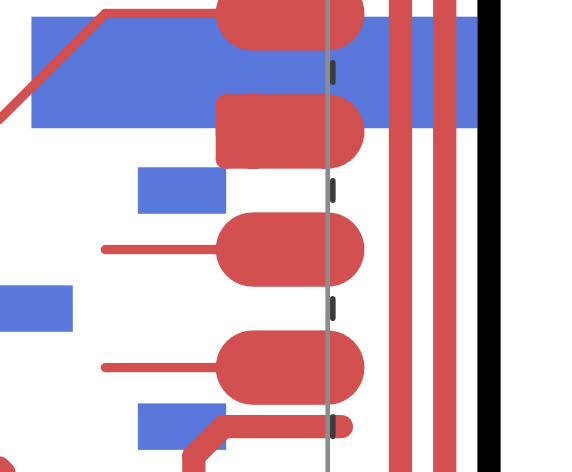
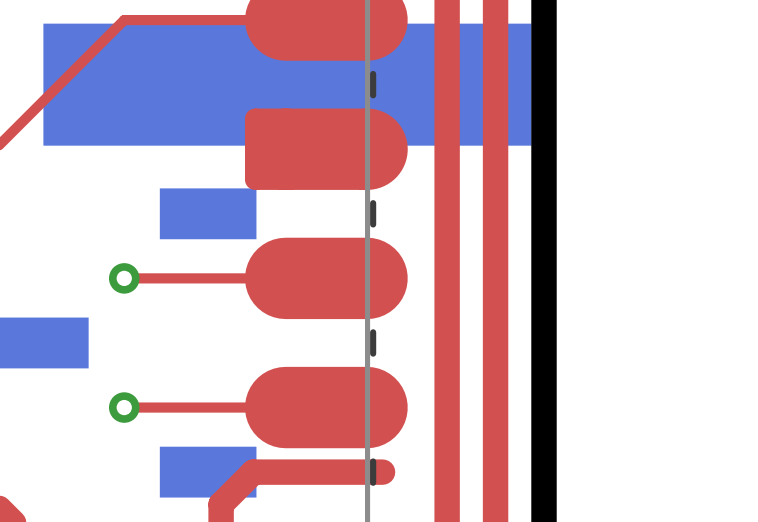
via: none -> (124, 278)
via: none -> (124, 407)

